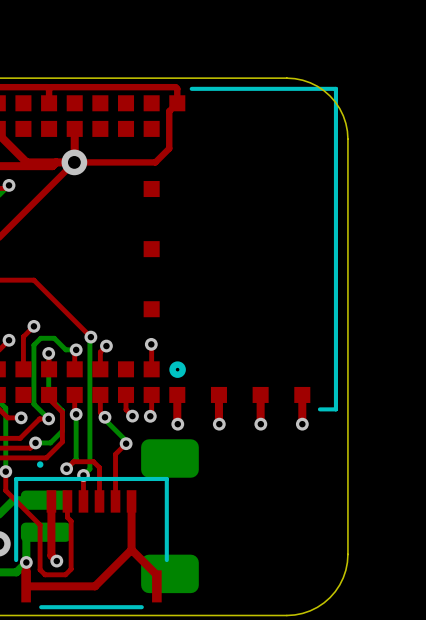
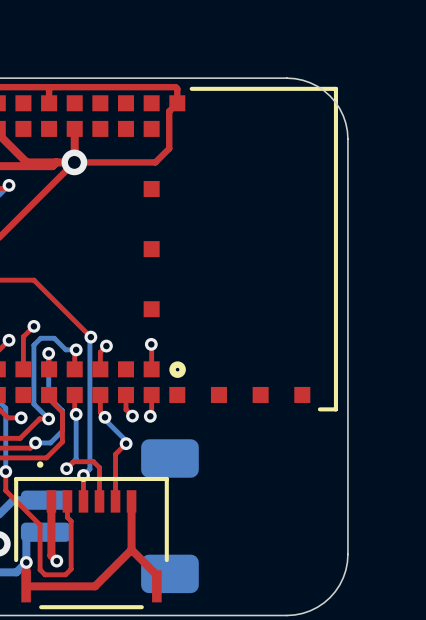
top track: (177, 394) (177, 424) -> none
top track: (218, 394) (218, 423) -> none
top track: (260, 394) (260, 423) -> none
top track: (302, 394) (302, 424) -> none
via: (177, 424) -> none
via: (219, 424) -> none
via: (260, 424) -> none
via: (302, 424) -> none

